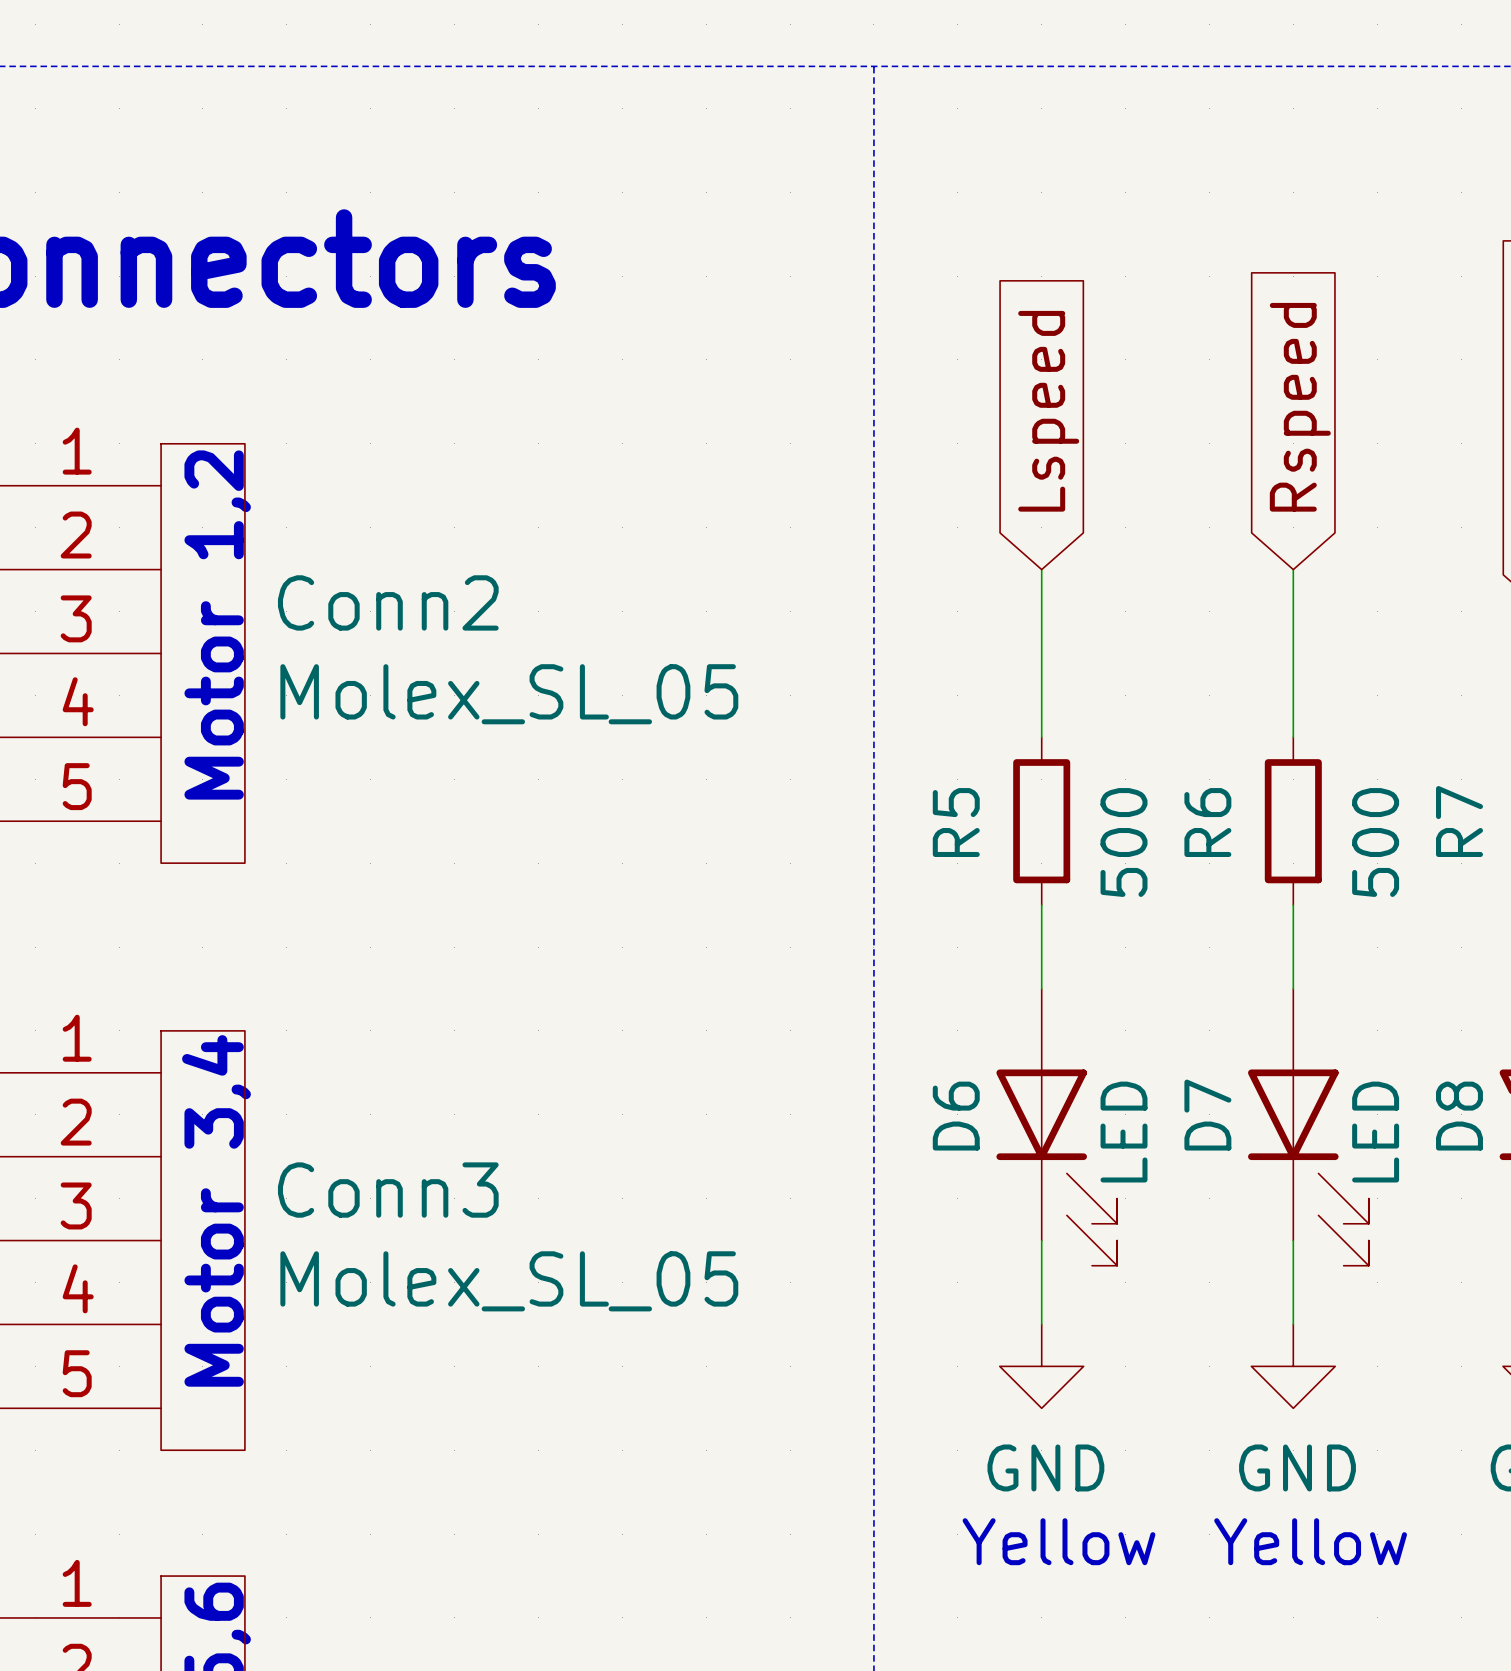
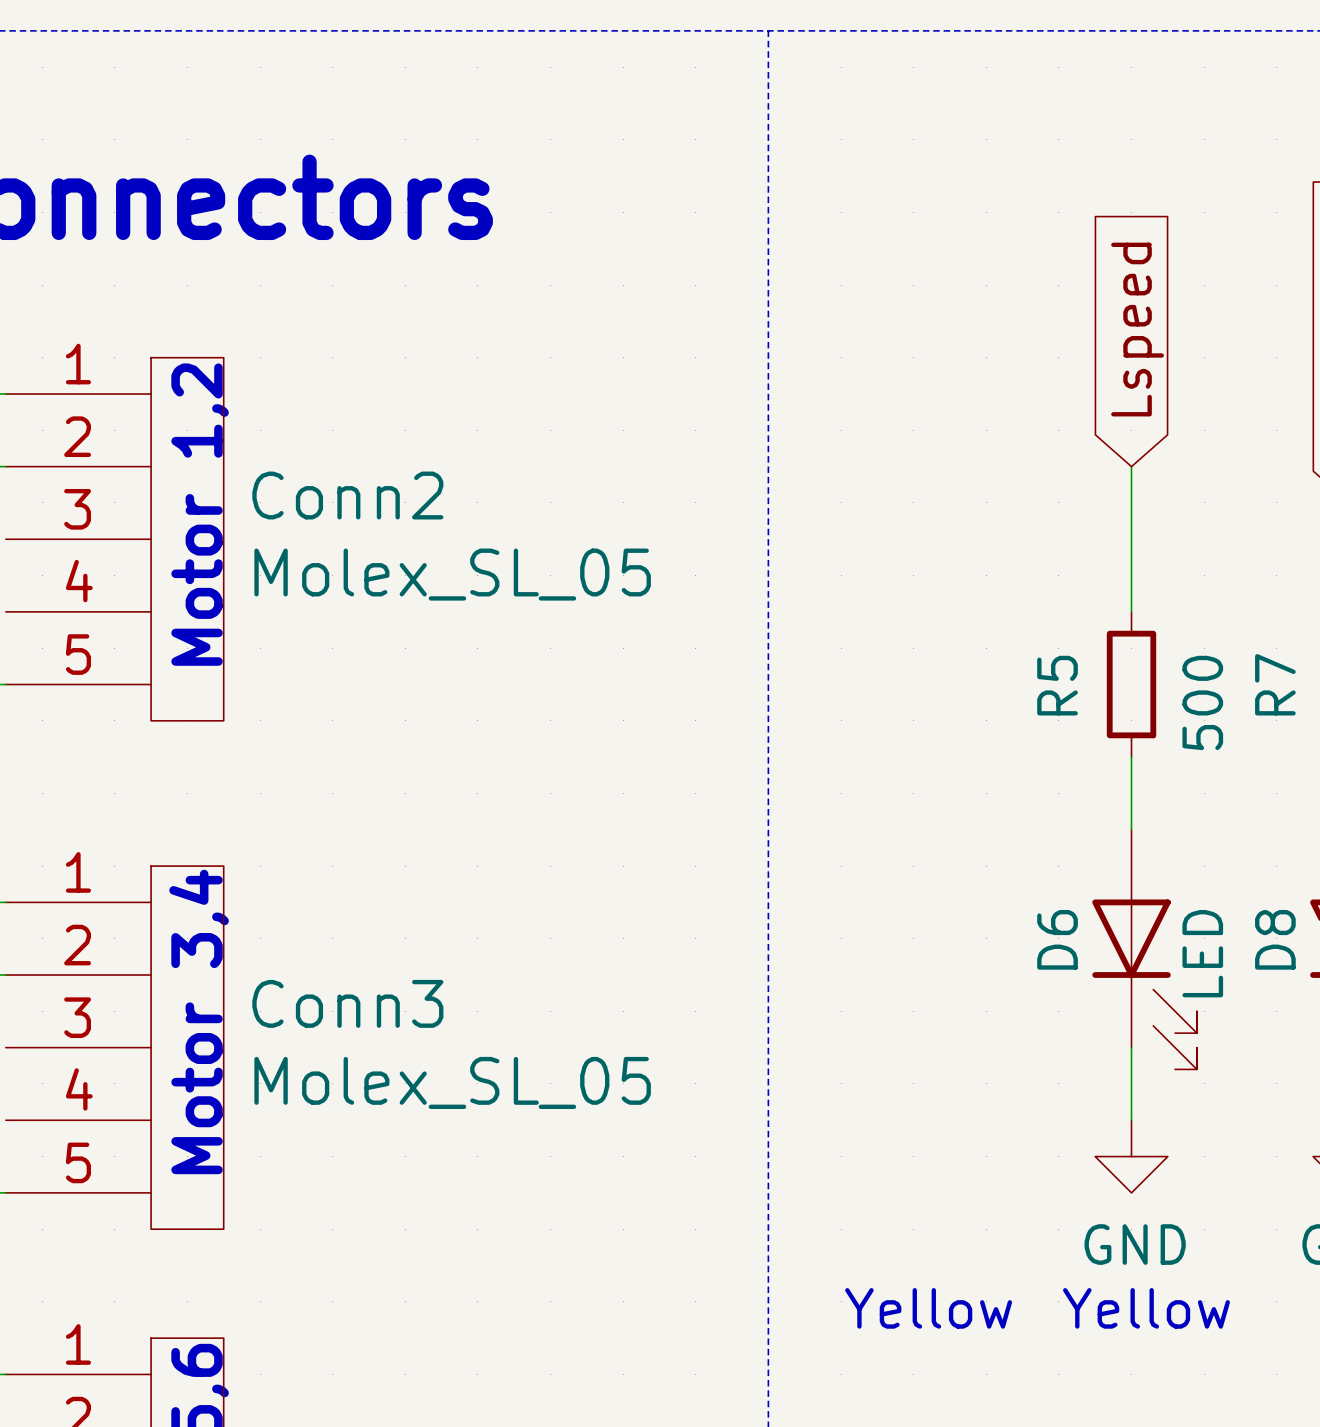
global label: Rspeed (1300, 407) -> Lspeed (1137, 329)
global label: Lspeed (1048, 411) -> none
wire: (1041, 569) (1041, 737) -> none
R5: 500 (1041, 821) -> none
R6 name: R6 (1207, 822) -> R5 (1057, 685)
wire: (1041, 905) (1041, 988) -> none
D7 name: D7 (1207, 1115) -> D6 (1057, 939)
D6: LED (1056, 1127) -> none
wire: (1041, 1240) (1041, 1324) -> none
power symbol: GND (1041, 1366) -> none

